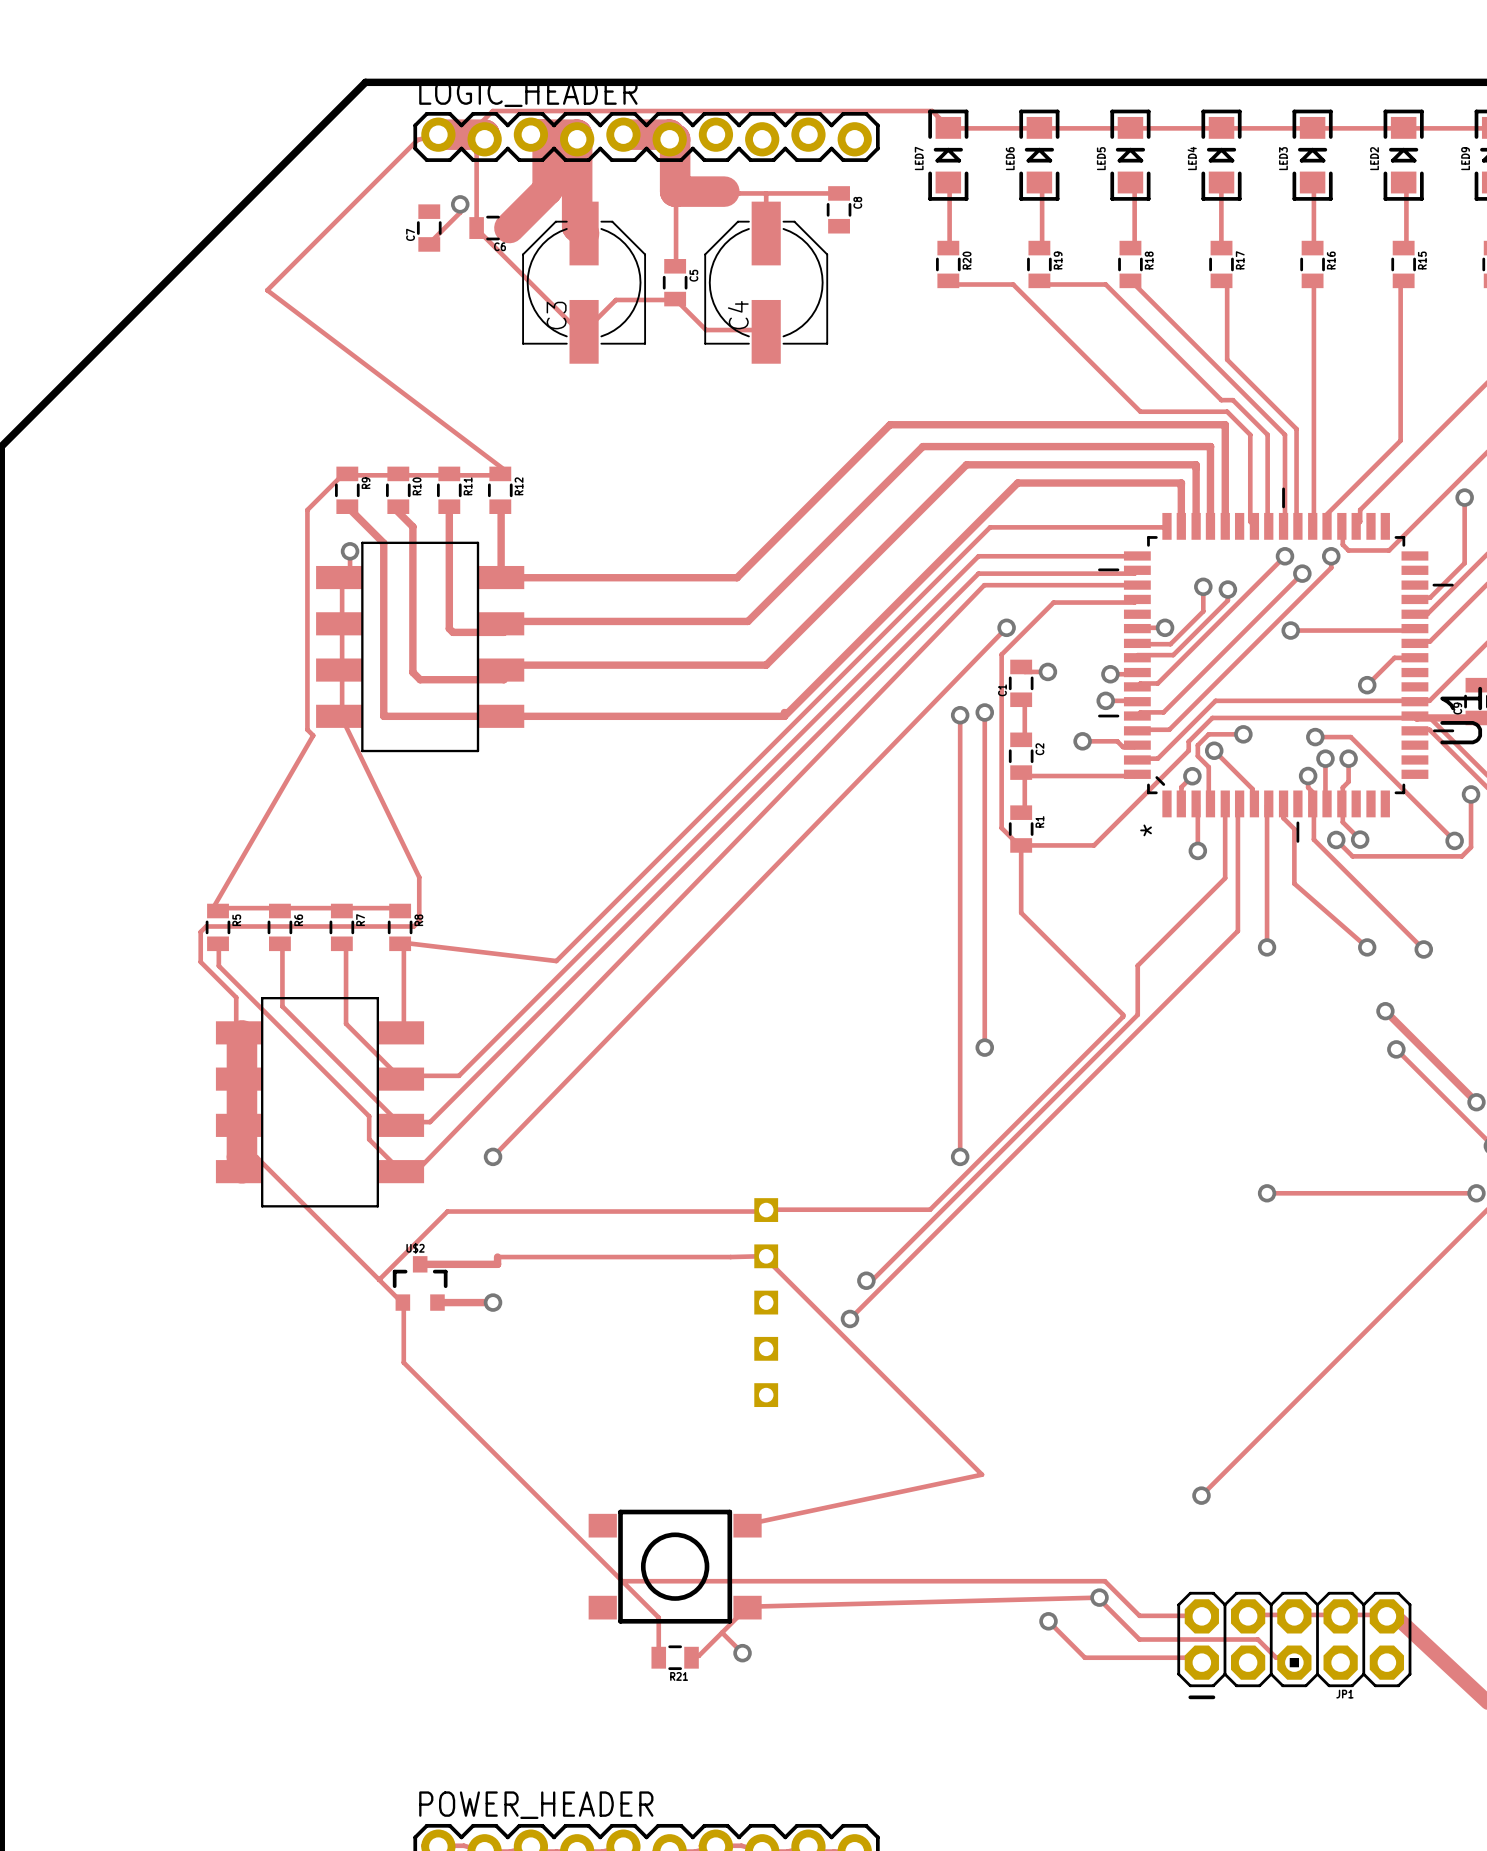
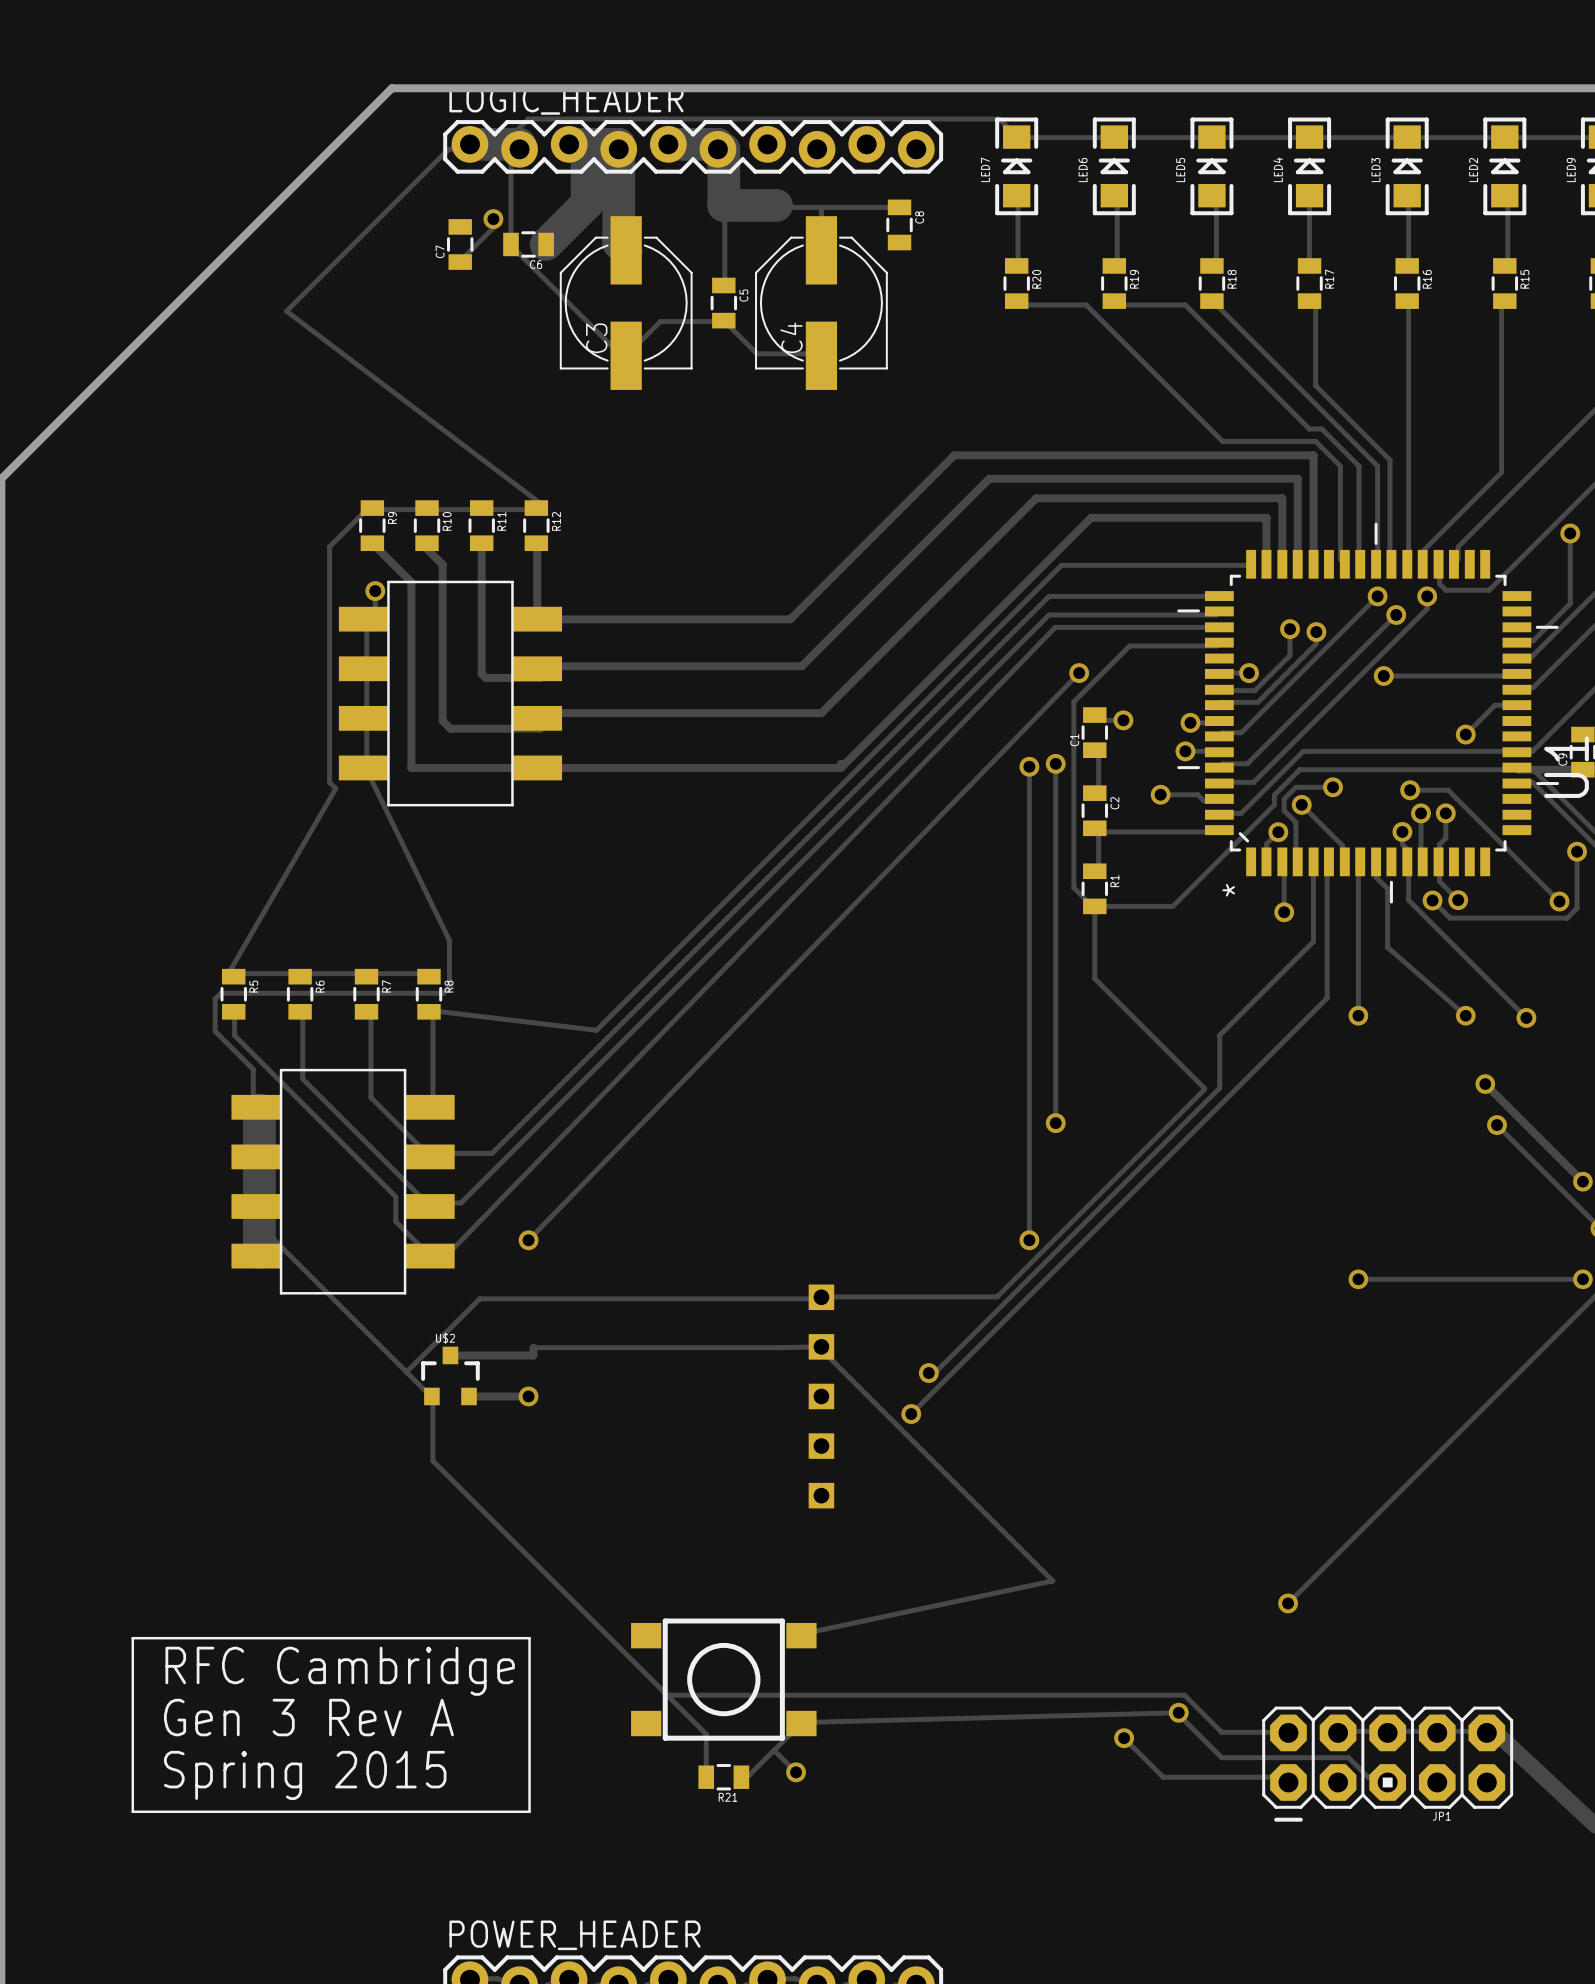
drawing: none -> [131, 1636, 531, 1814]

